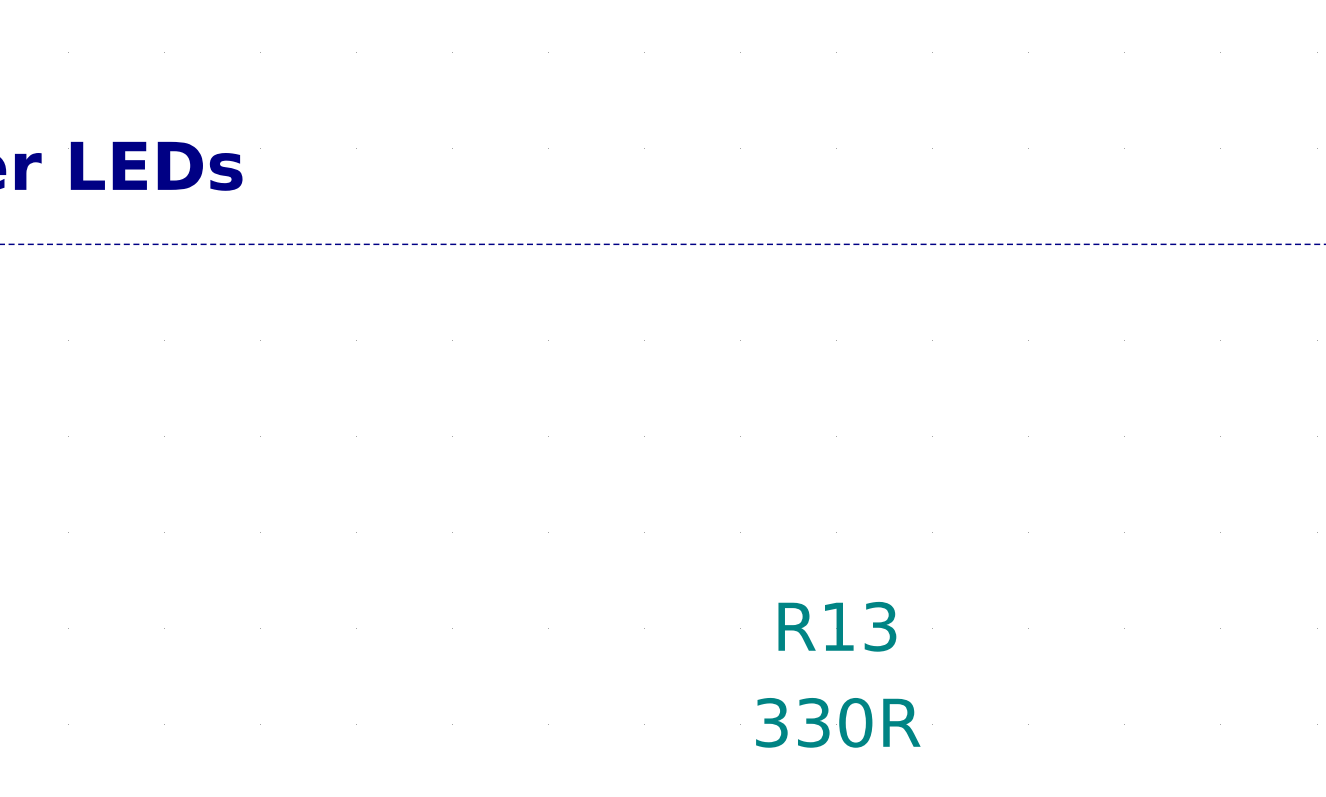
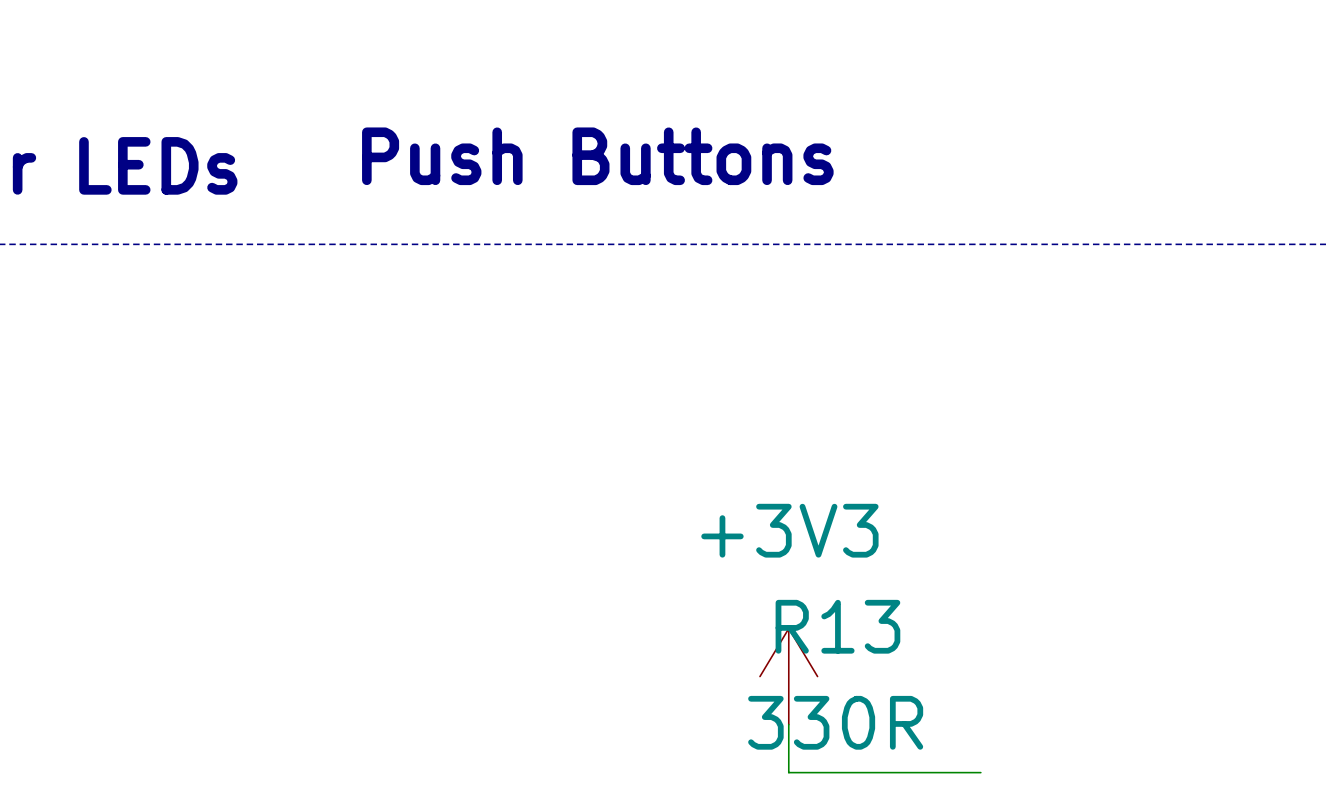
text: none -> Push Buttons (597, 156)
power symbol: none -> +3V3 (788, 676)
wire: none -> (788, 724) (788, 772) (980, 772)

